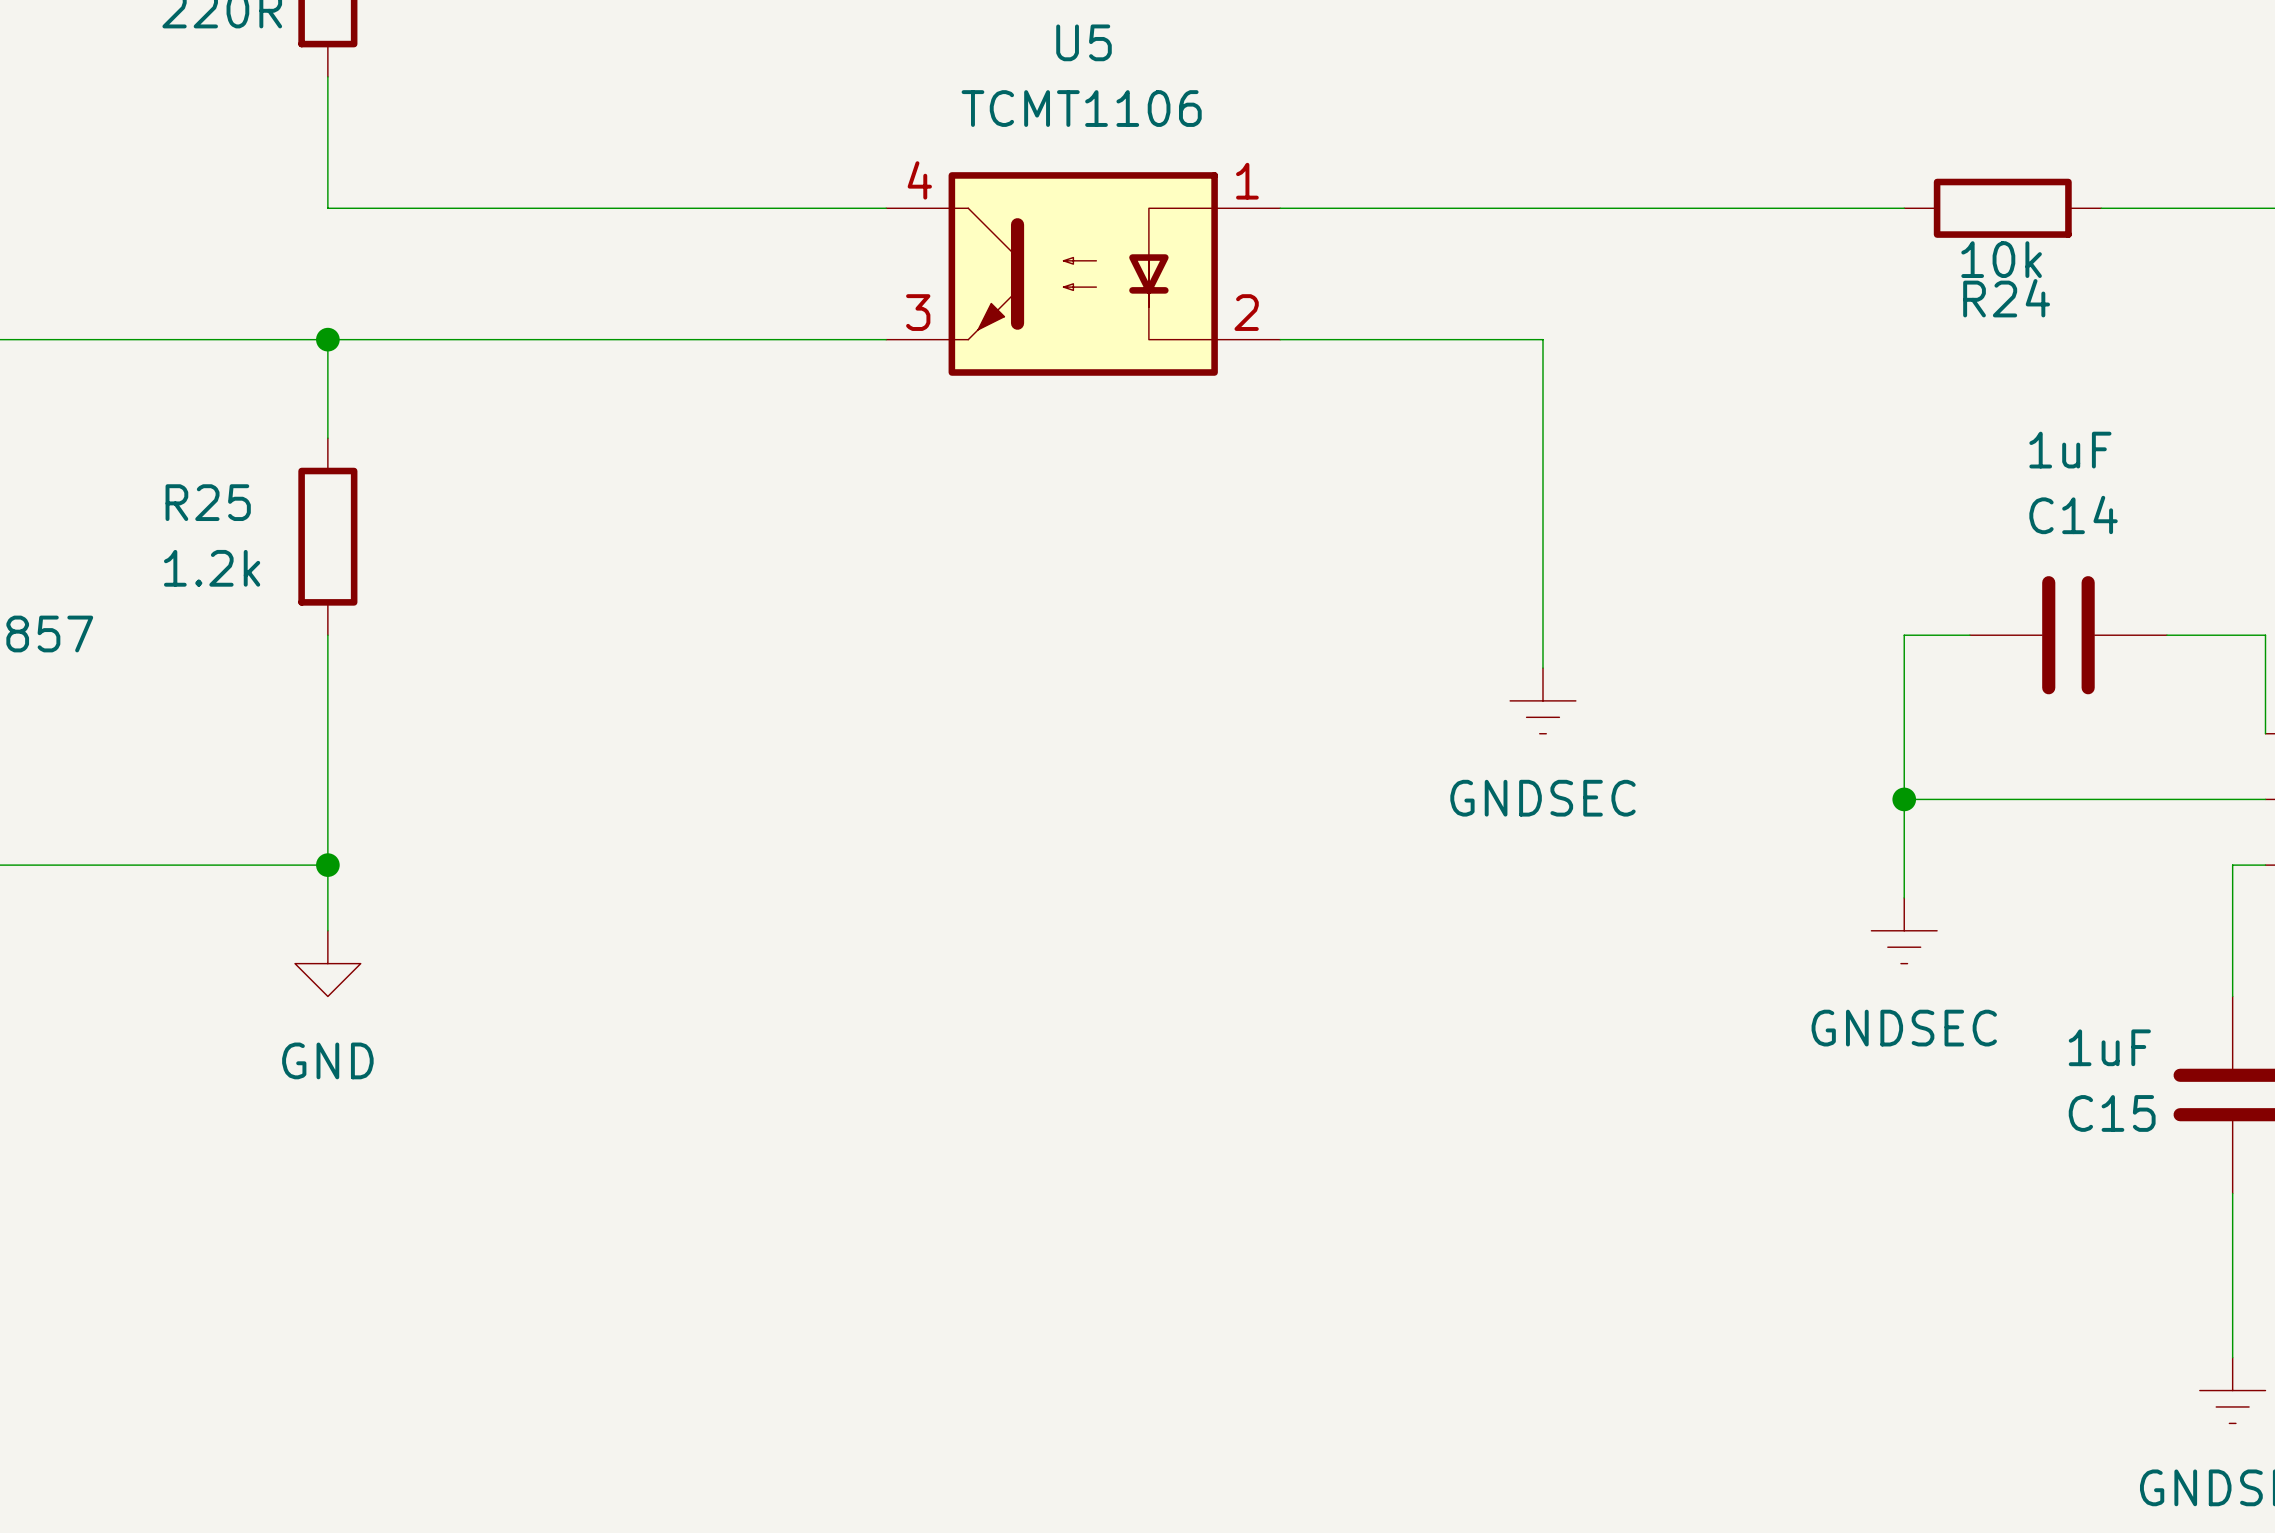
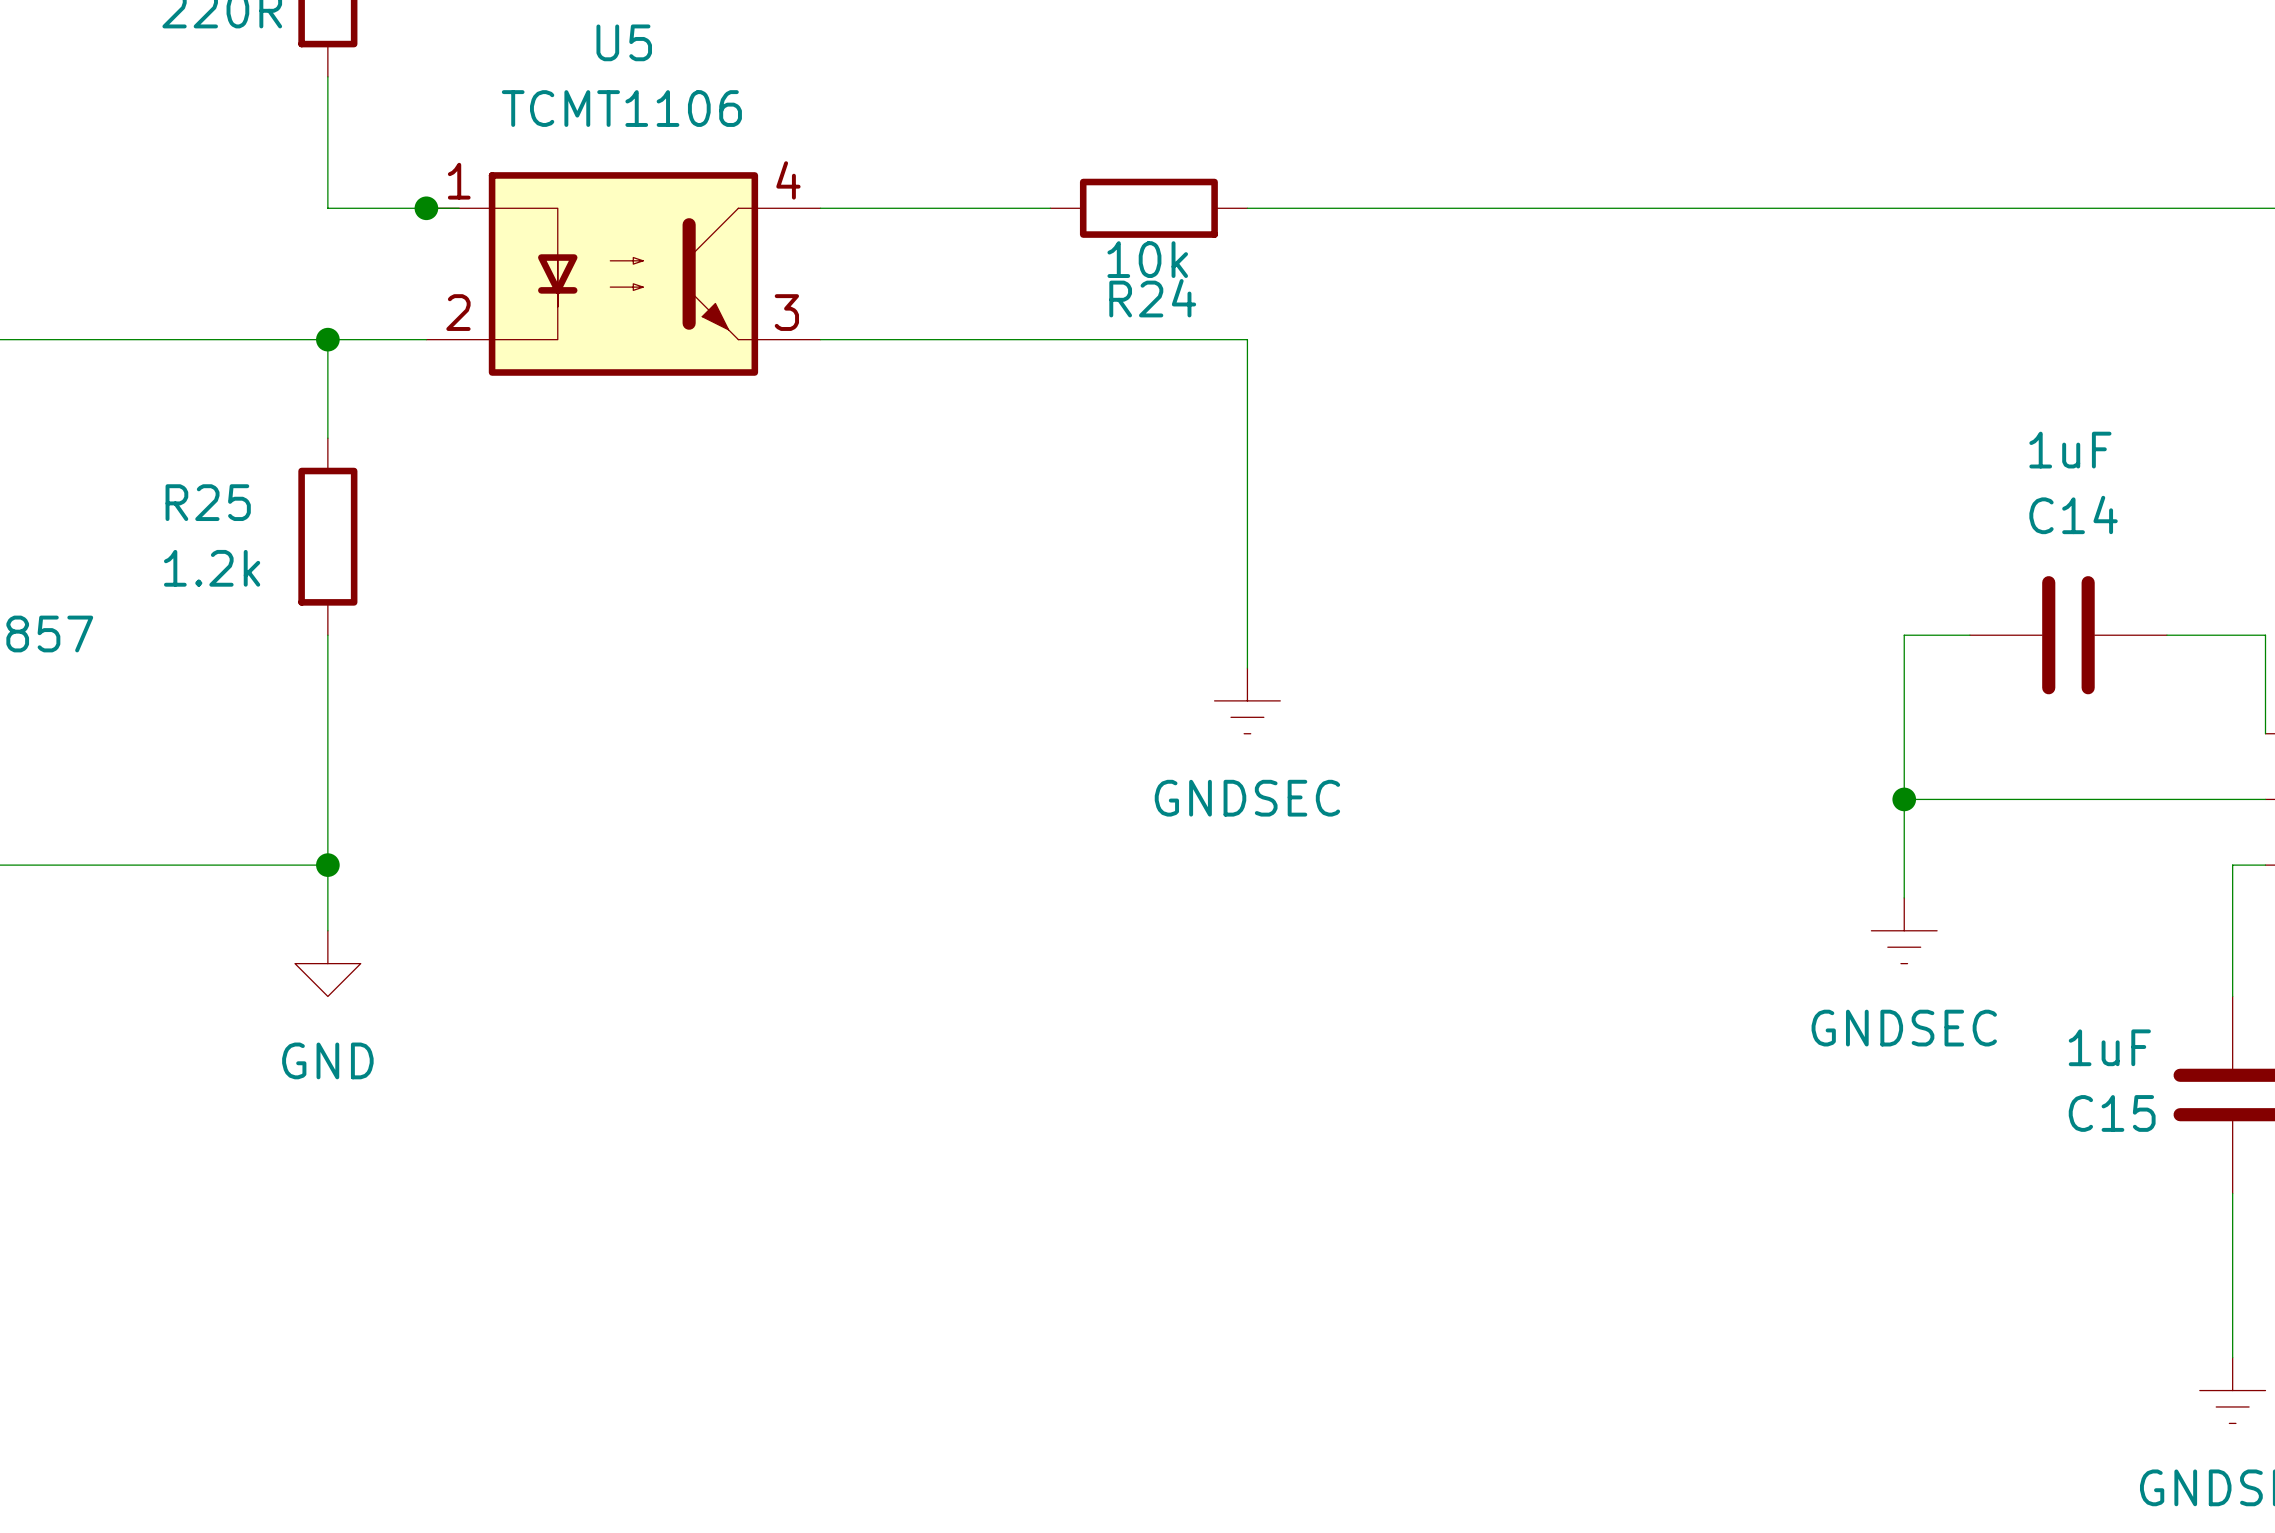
junction: none -> (426, 208)
wire: none -> (1904, 208) (2101, 208)
R24 position: (2002, 208) -> (1148, 208)
U5 flip: as is (1083, 273) -> left-right (623, 273)
U5 position: (1083, 273) -> (623, 273)
wire: none -> (886, 339) (1247, 339) (1247, 668)
wire: (1280, 339) (1542, 339) (1542, 668) -> none
power symbol position: GNDSEC (1542, 700) -> GNDSEC (1247, 700)

